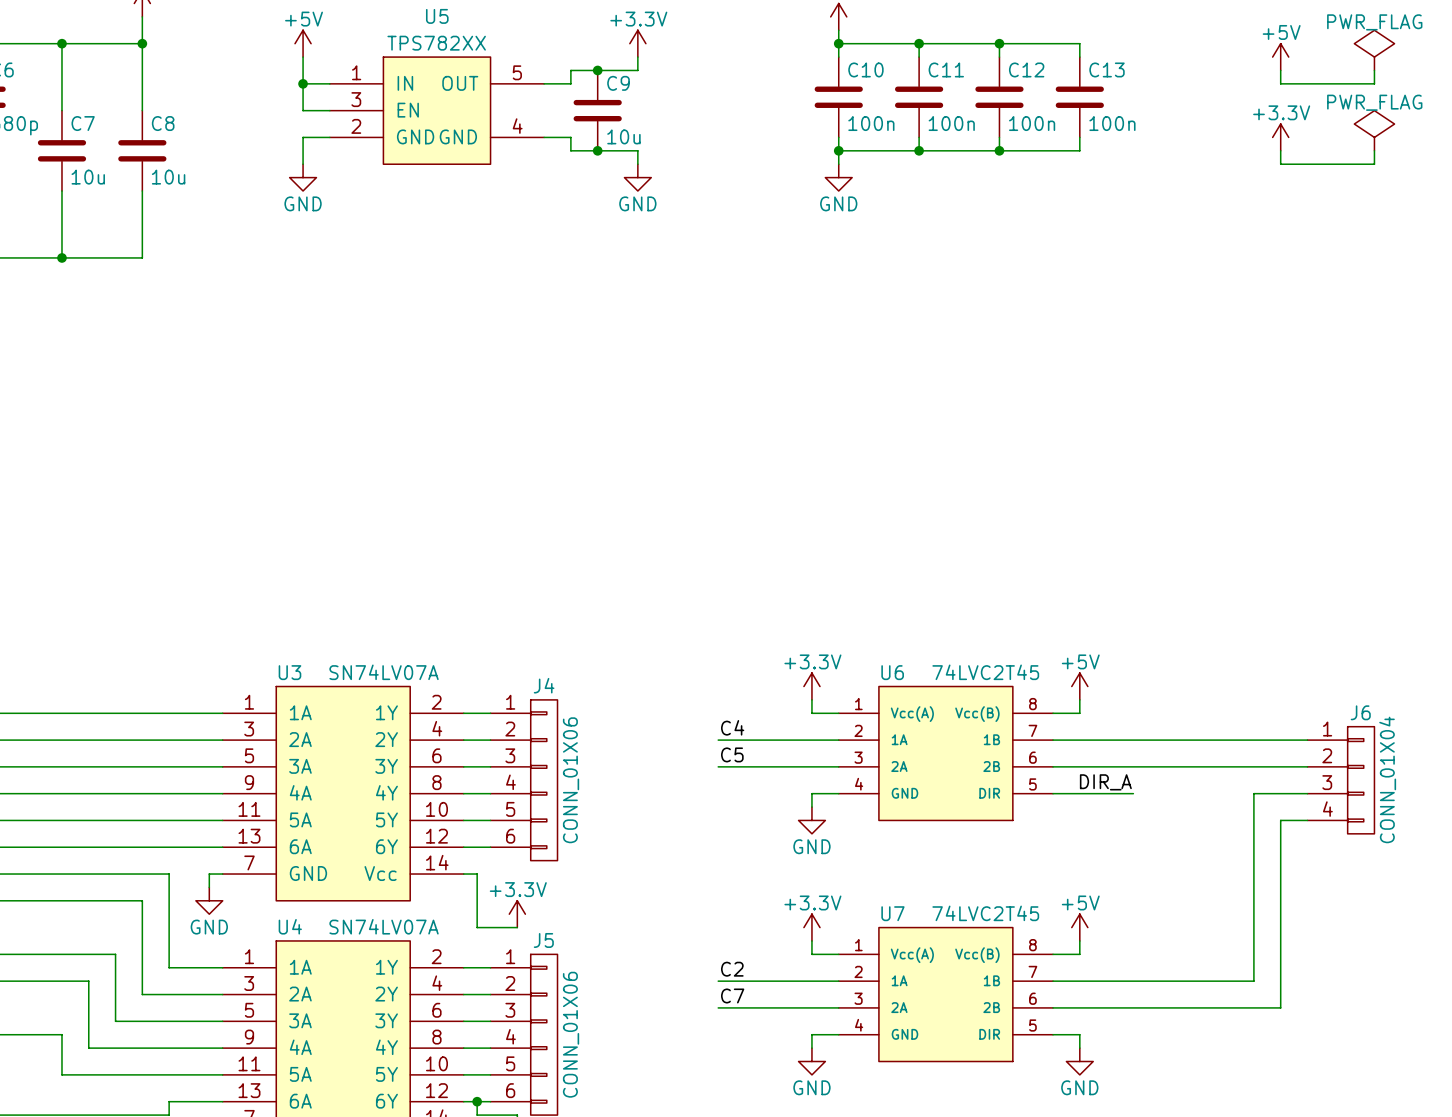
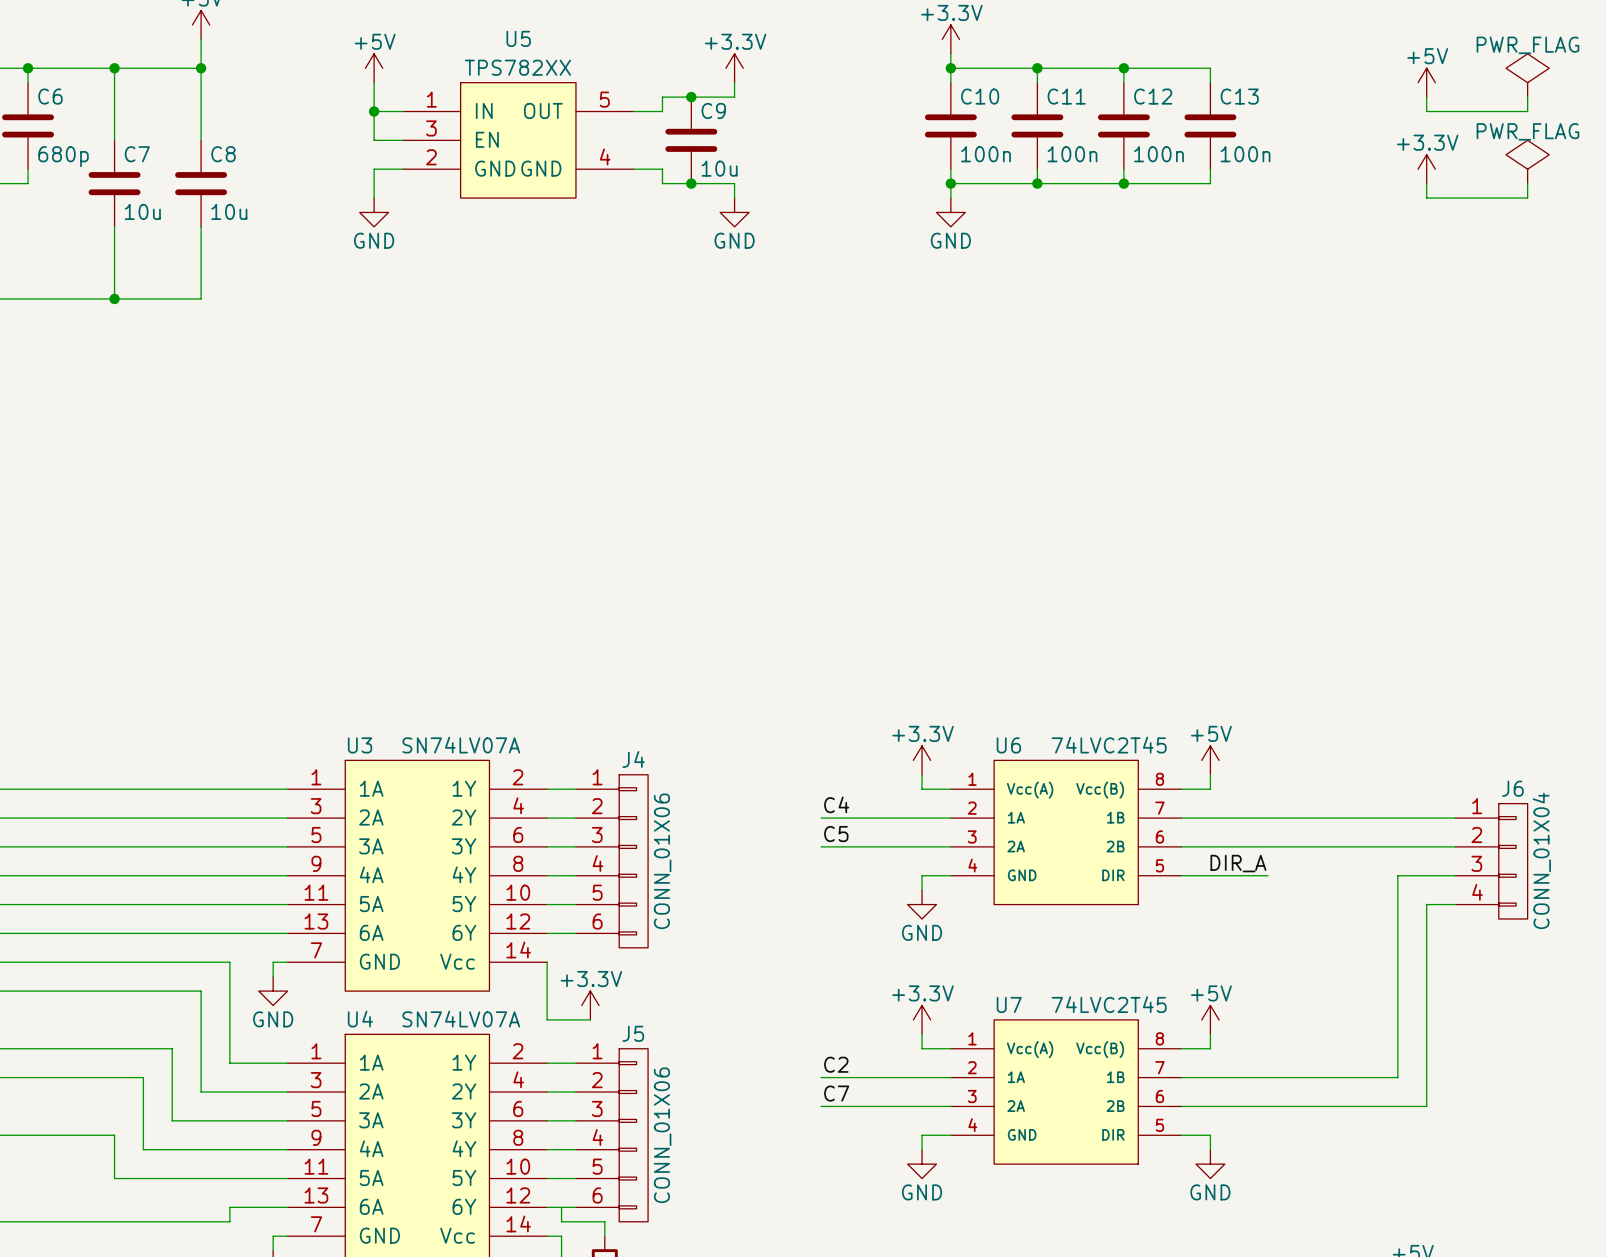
wire: (463, 874) (477, 874) (477, 927) -> (547, 962) (547, 1019) (561, 1019)
power symbol position: +3.3V (517, 914) -> +3.3V (590, 1005)
wire: (503, 927) (517, 927) -> none
junction: (477, 1101) -> none

